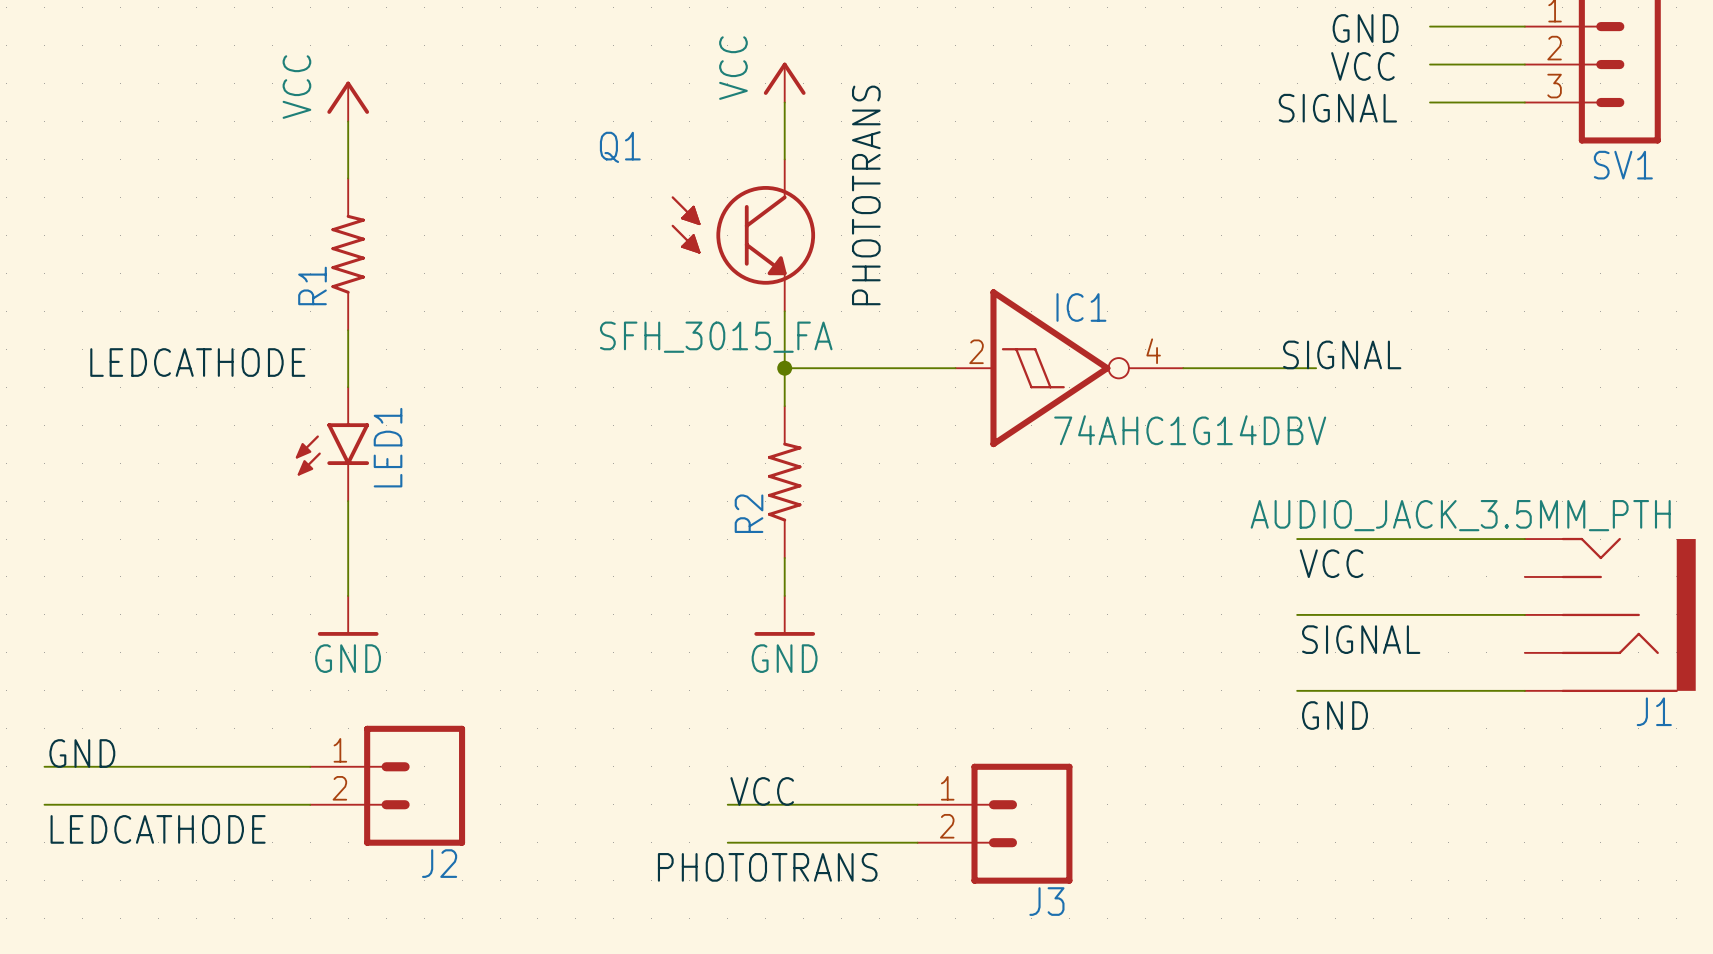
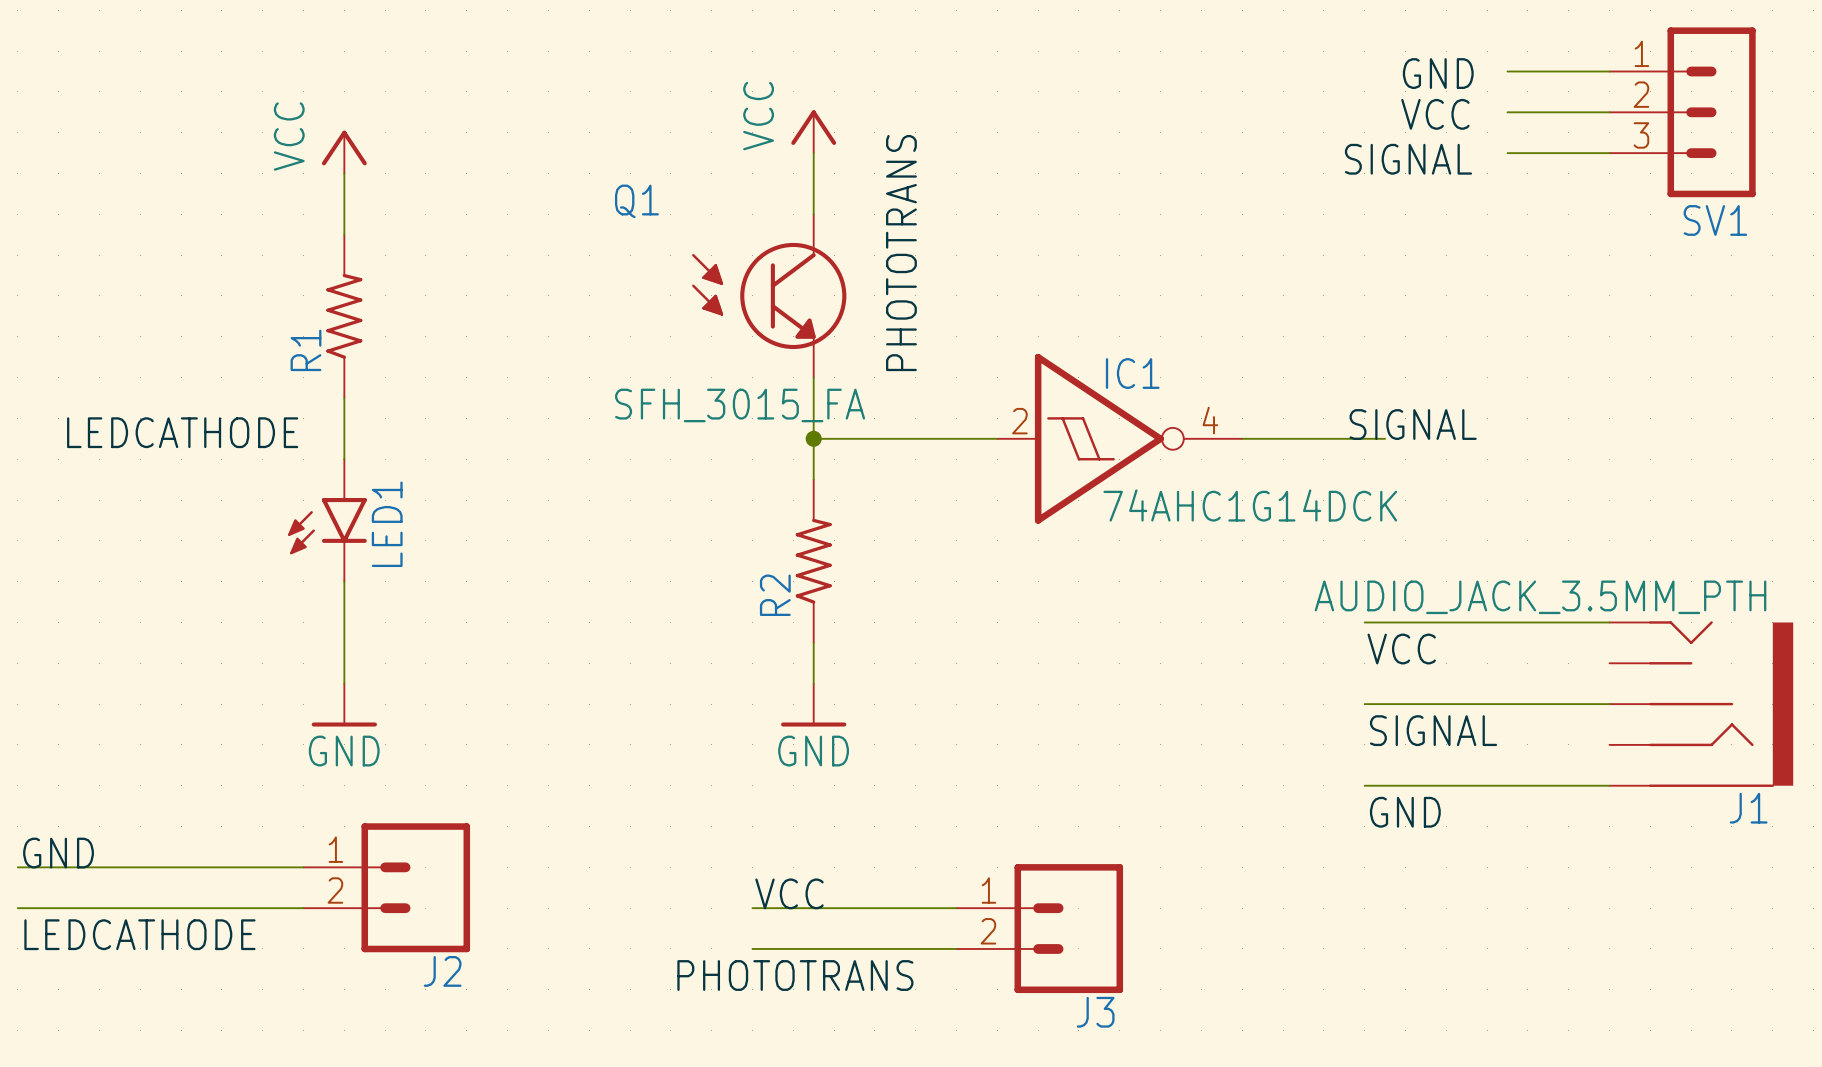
IC1 value: 74AHC1G14DBV (1190, 430) -> 74AHC1G14DCK (1250, 505)

